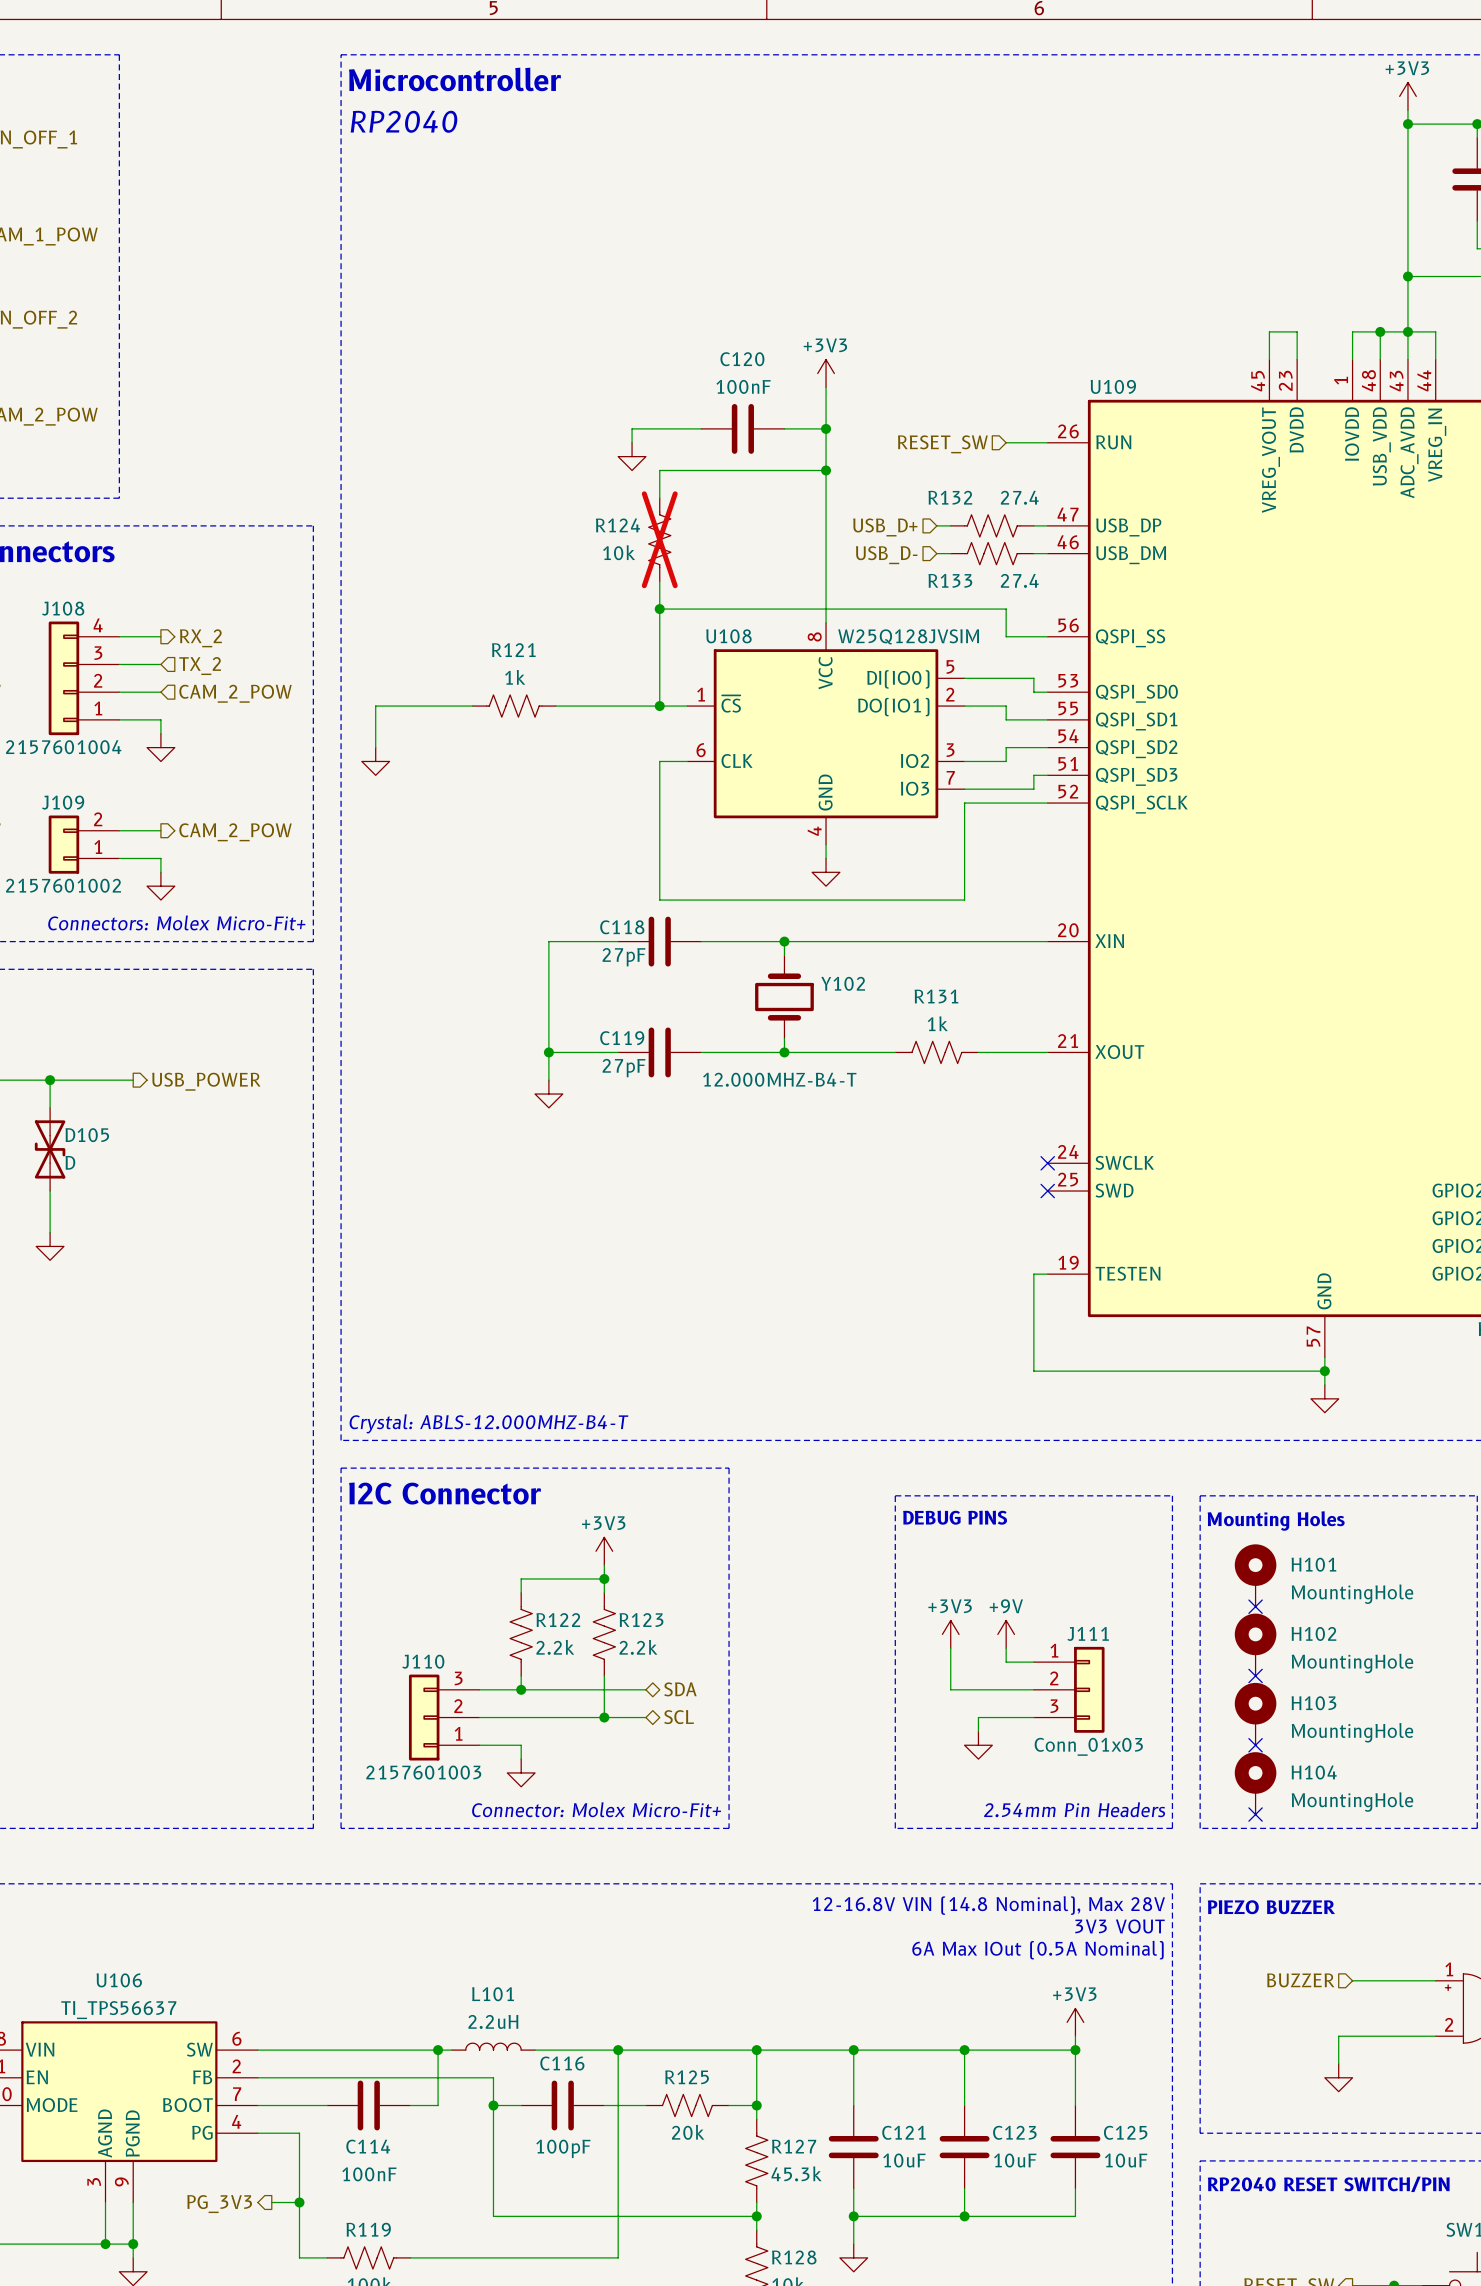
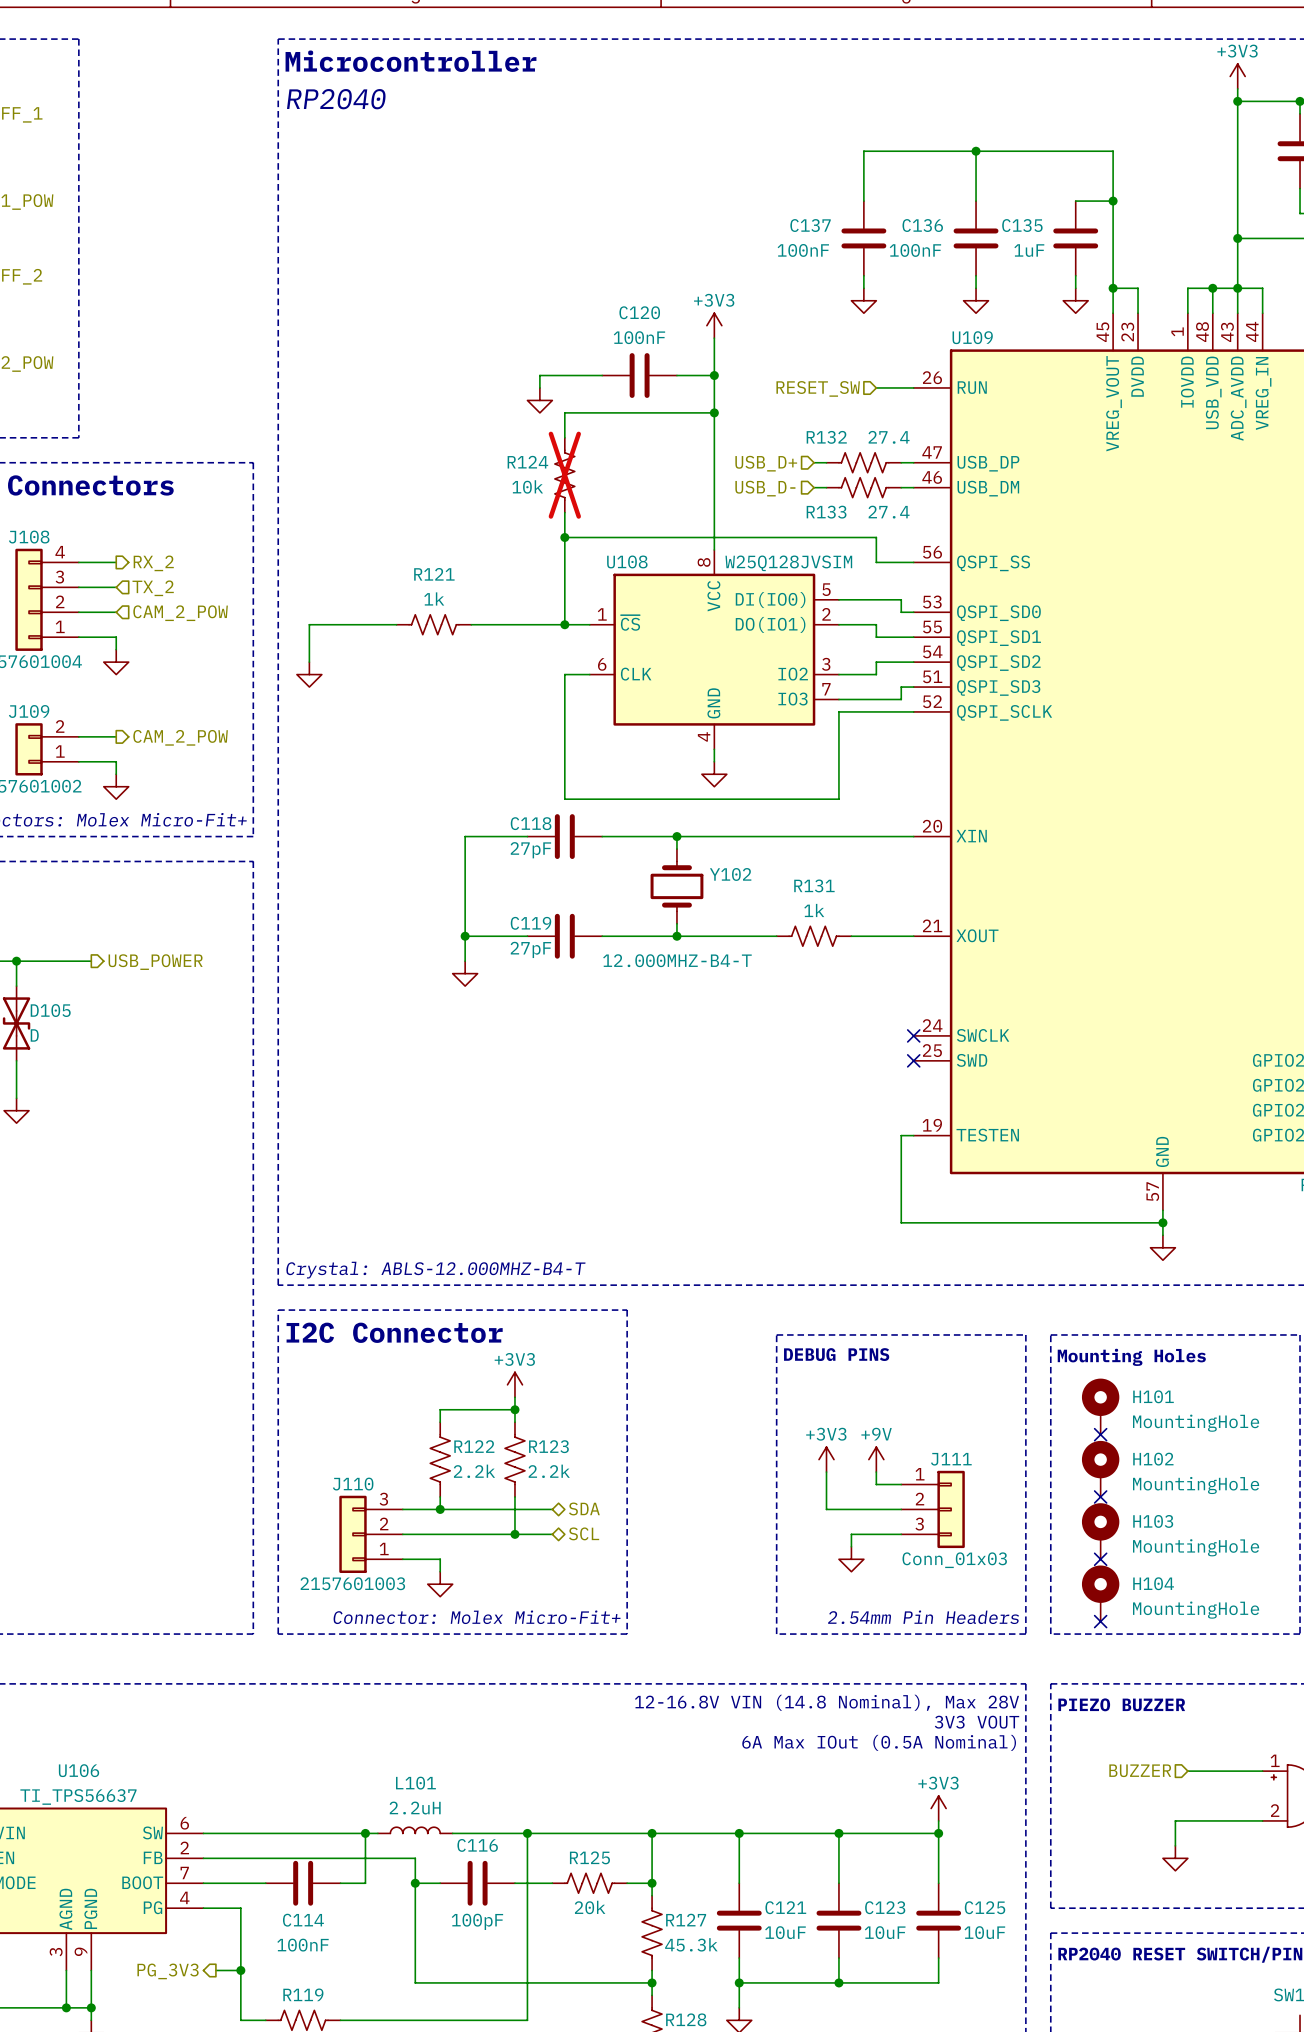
wire: none -> (976, 151) (976, 201)
junction: none -> (976, 151)
wire: none -> (863, 201) (863, 151) (1113, 151) (1113, 288)
wire: none -> (1075, 201) (1113, 201)
junction: none -> (1113, 201)
C137: none -> 100nF (863, 238)
C136: none -> 100nF (976, 238)
C135: none -> 1uF (1075, 238)
wire: none -> (863, 275) (863, 288)
wire: none -> (976, 275) (976, 288)
wire: none -> (1075, 275) (1075, 288)
junction: none -> (1113, 288)
power symbol: none -> (863, 300)
power symbol: none -> (976, 300)
power symbol: none -> (1075, 300)

